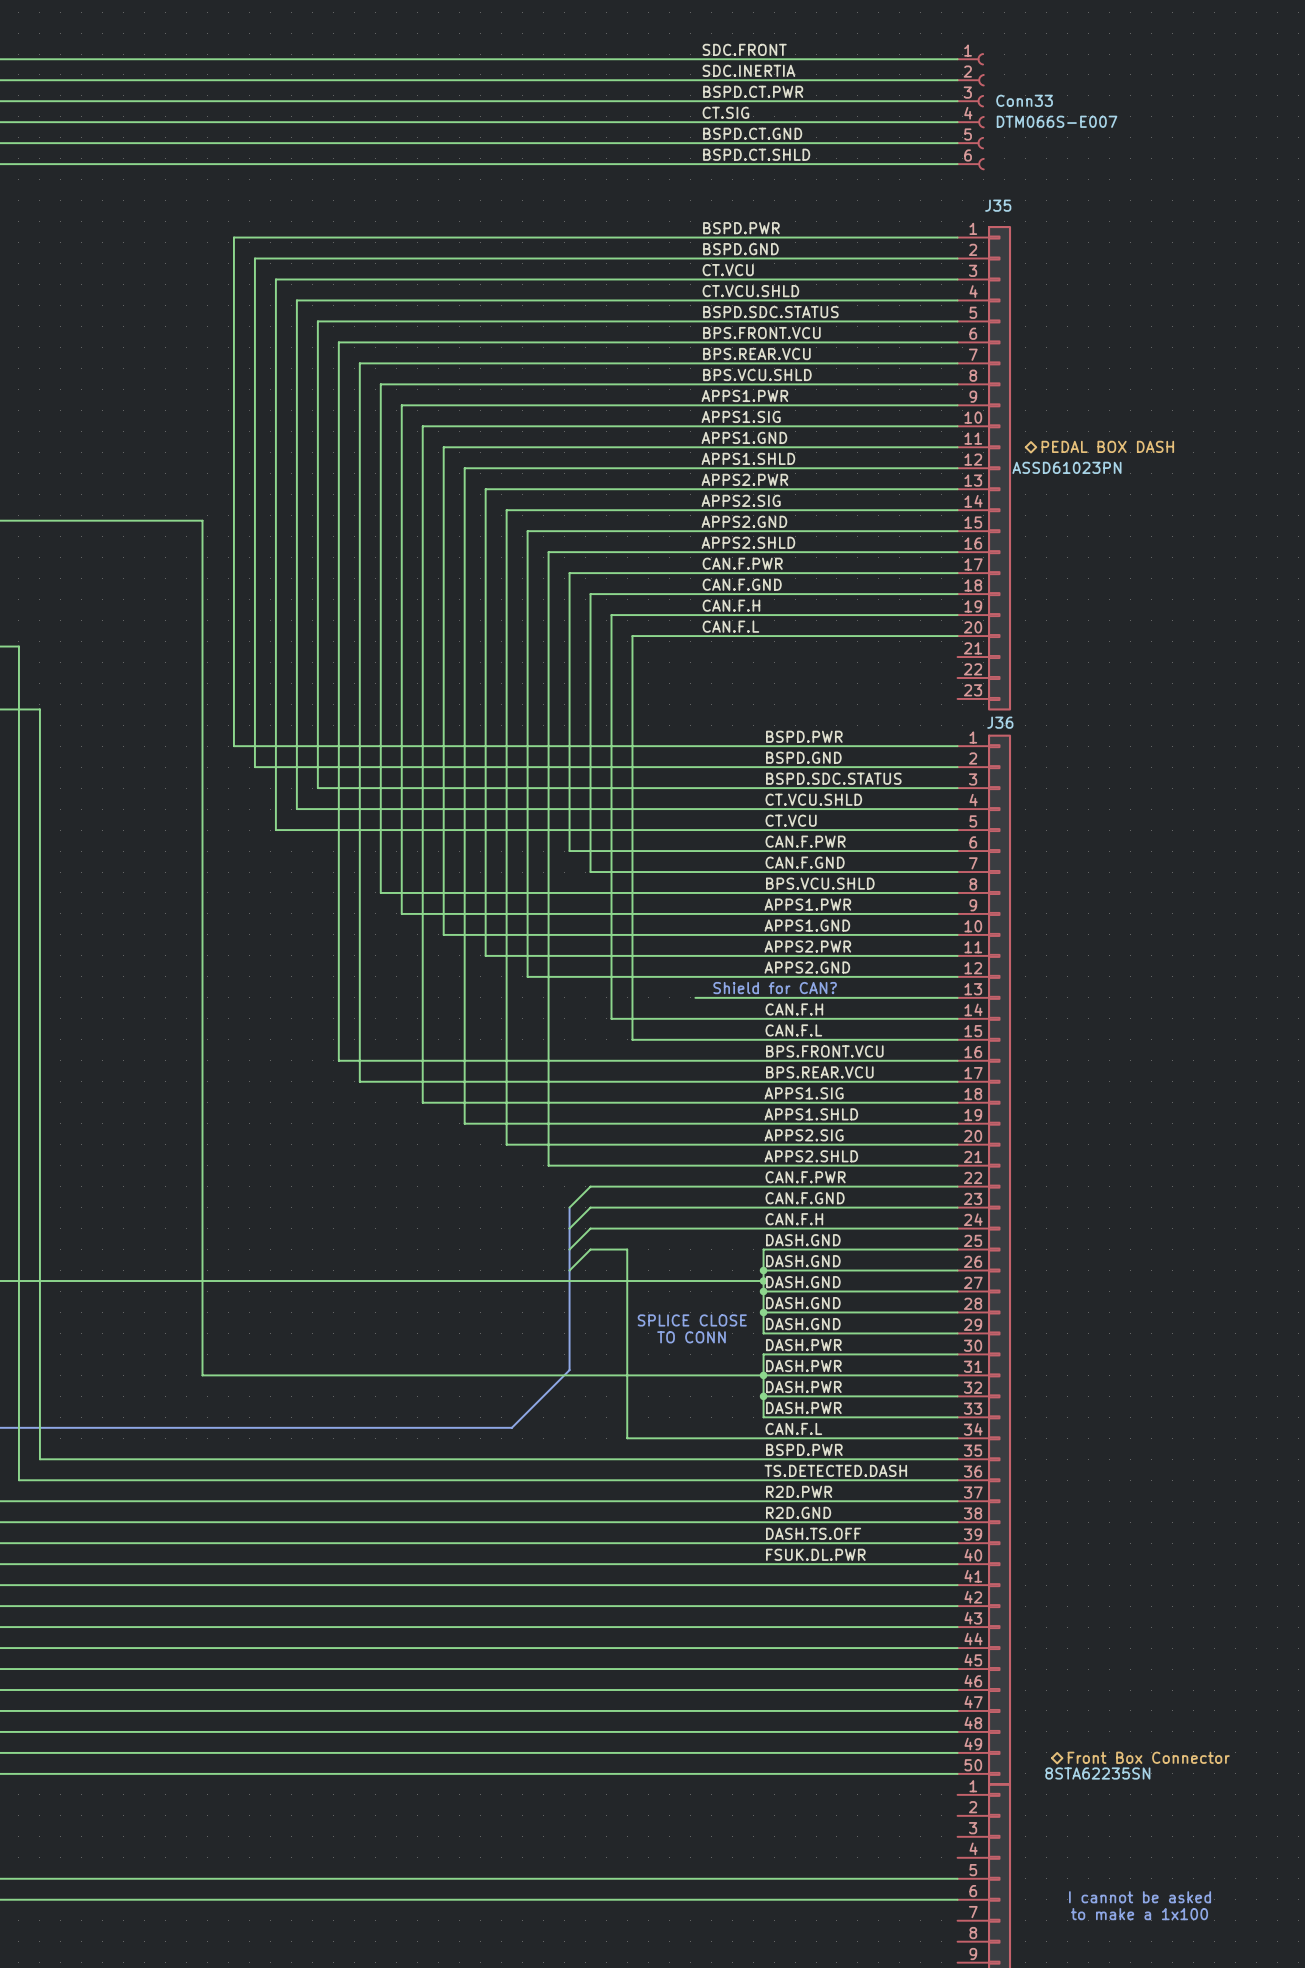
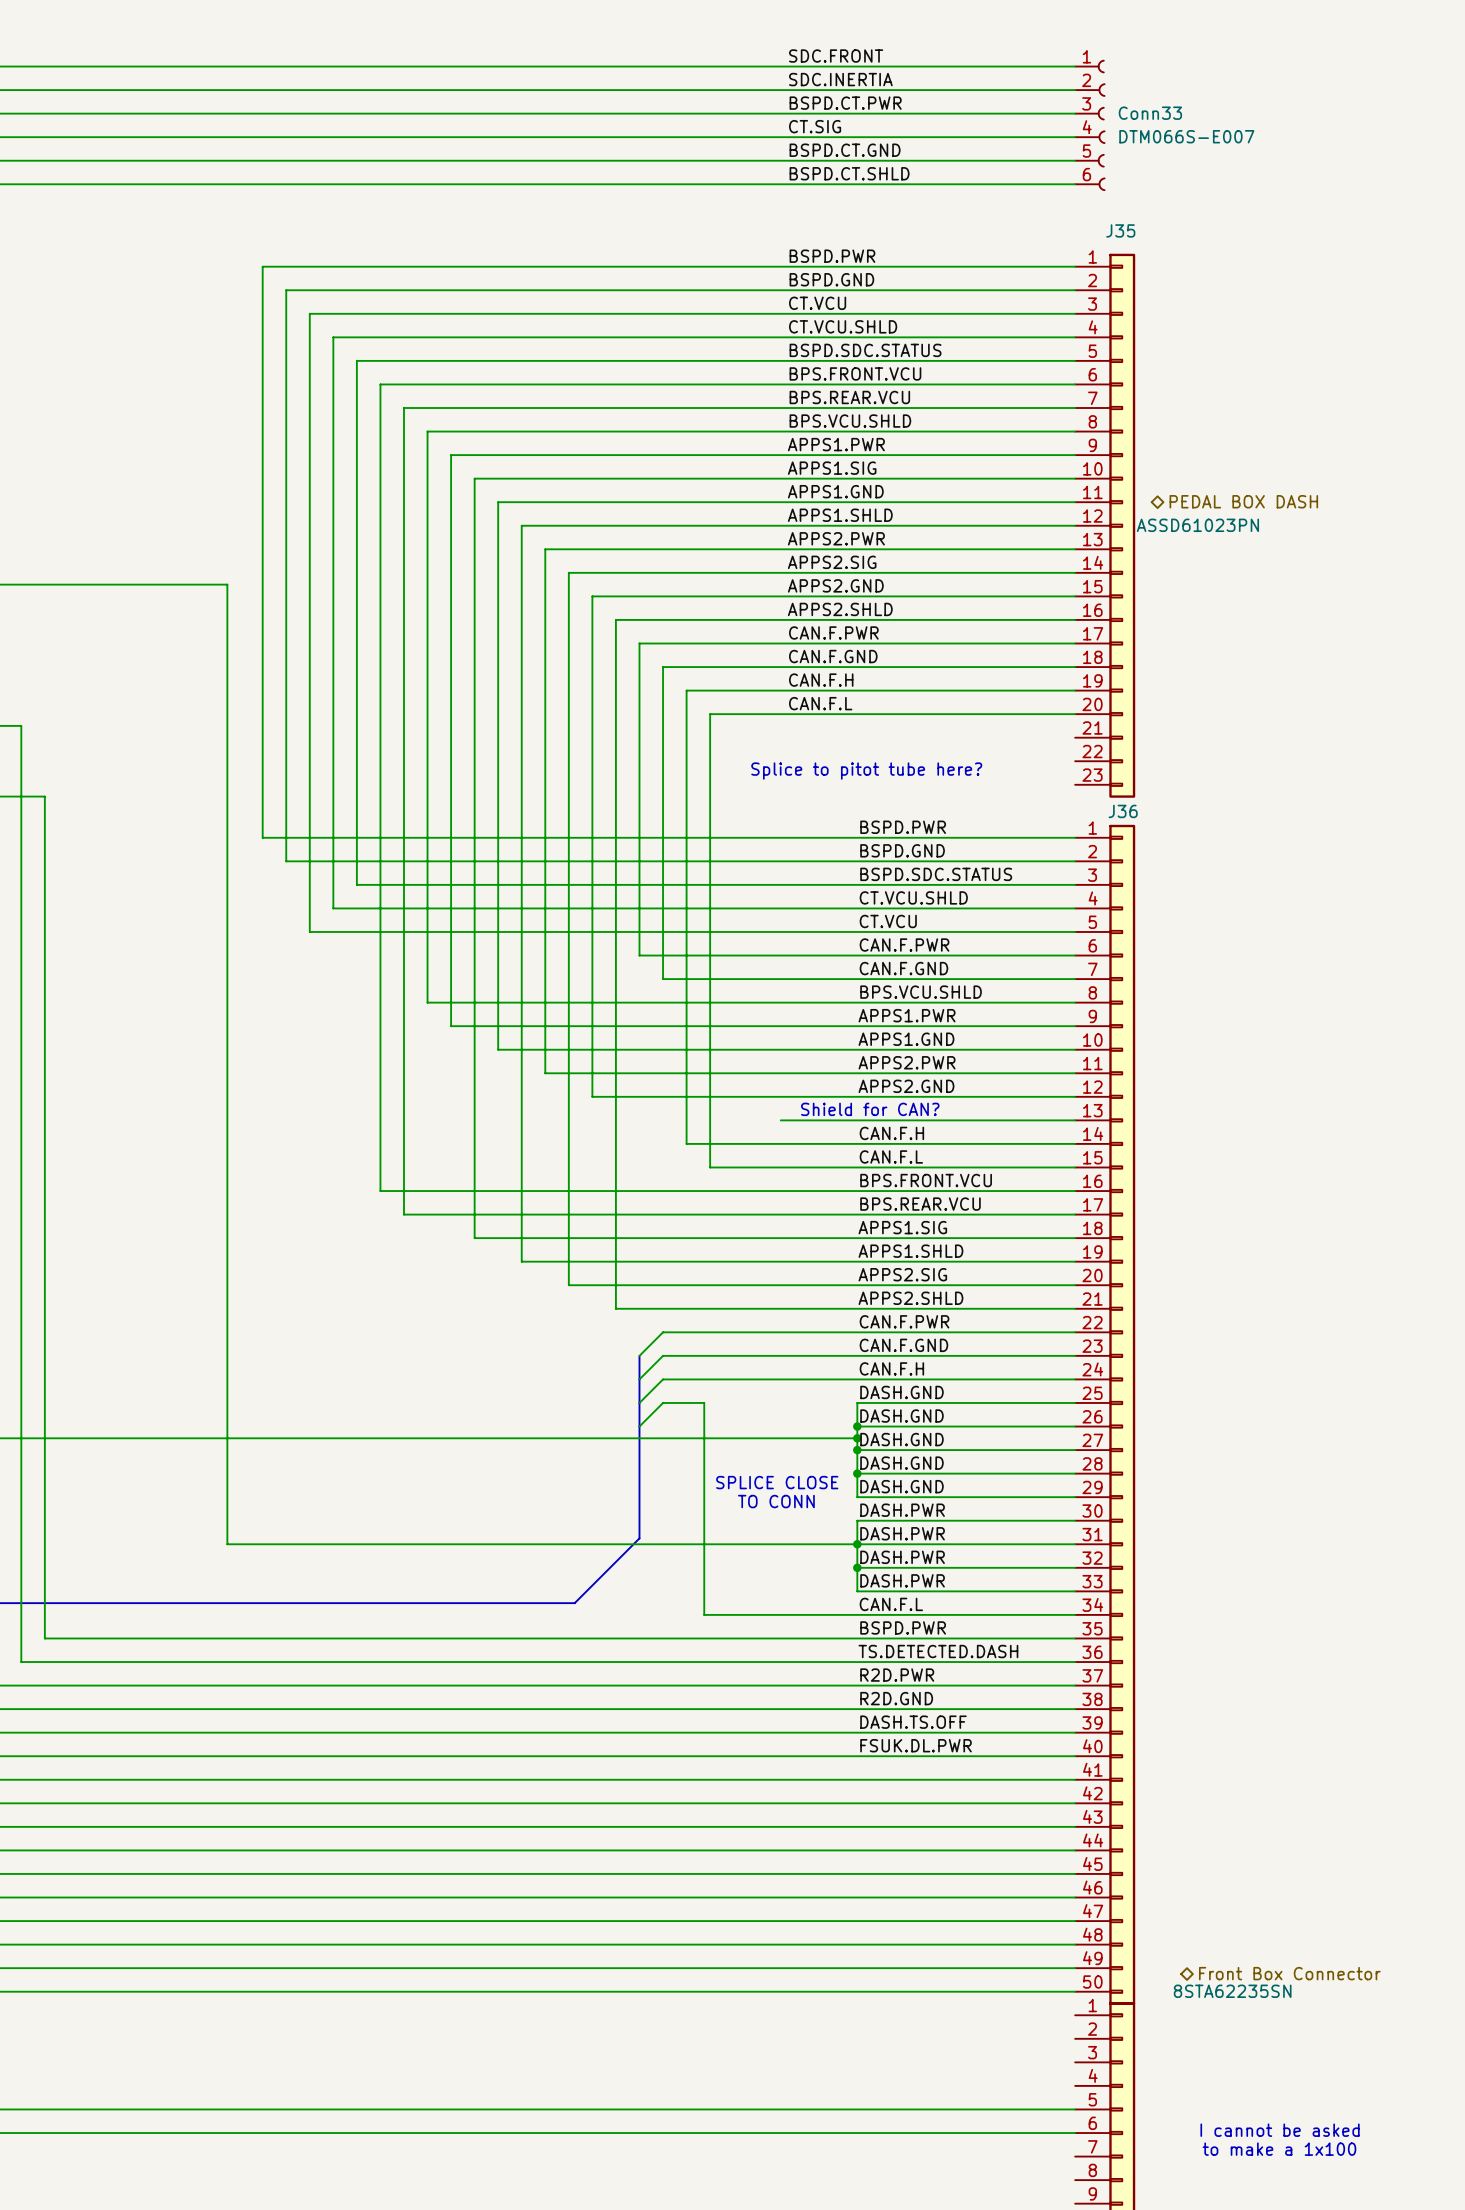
text: none -> Splice to pitot tube here? (866, 771)

